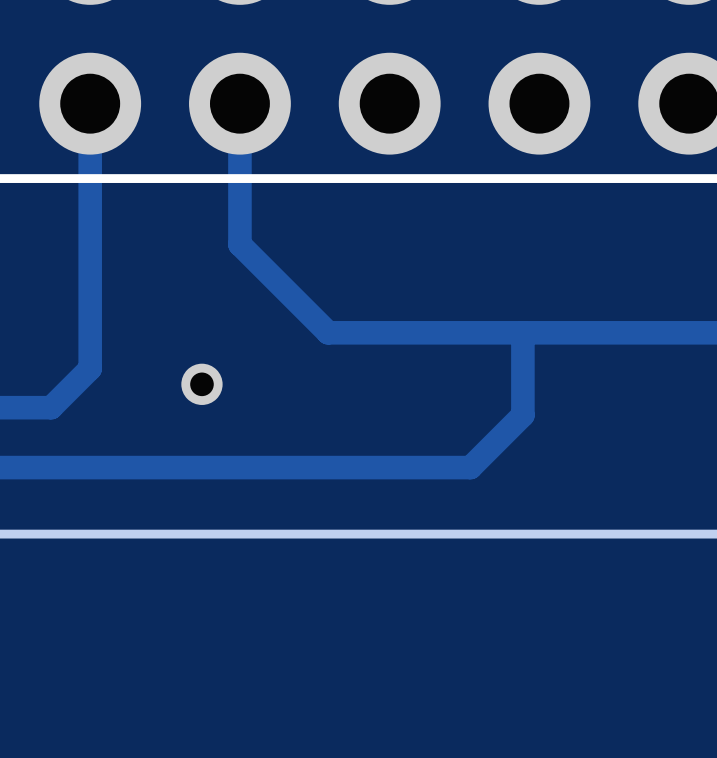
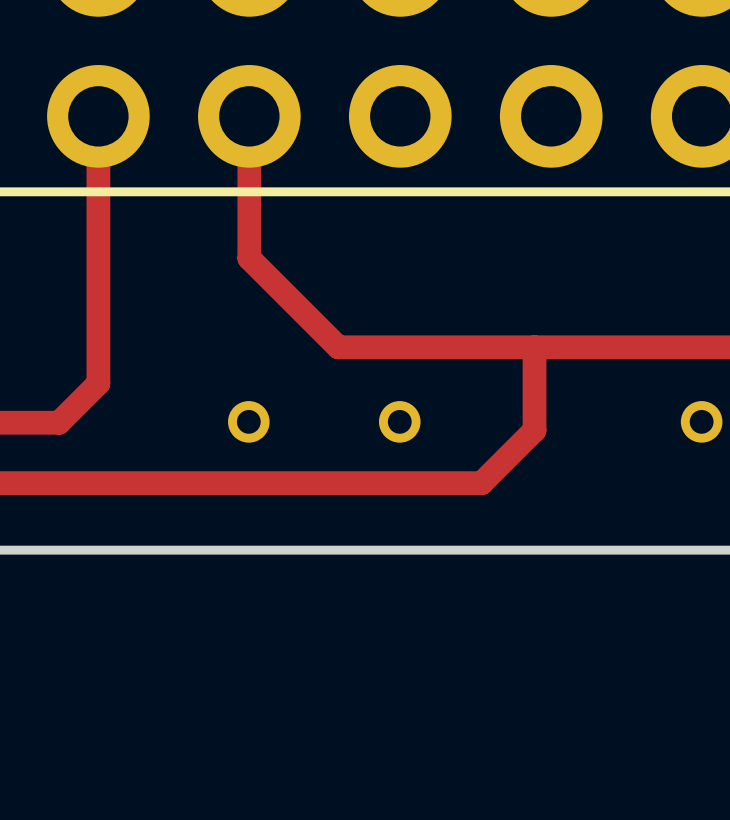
part position: (201, 384) -> (248, 421)
part: none -> (399, 421)
part: none -> (701, 421)

